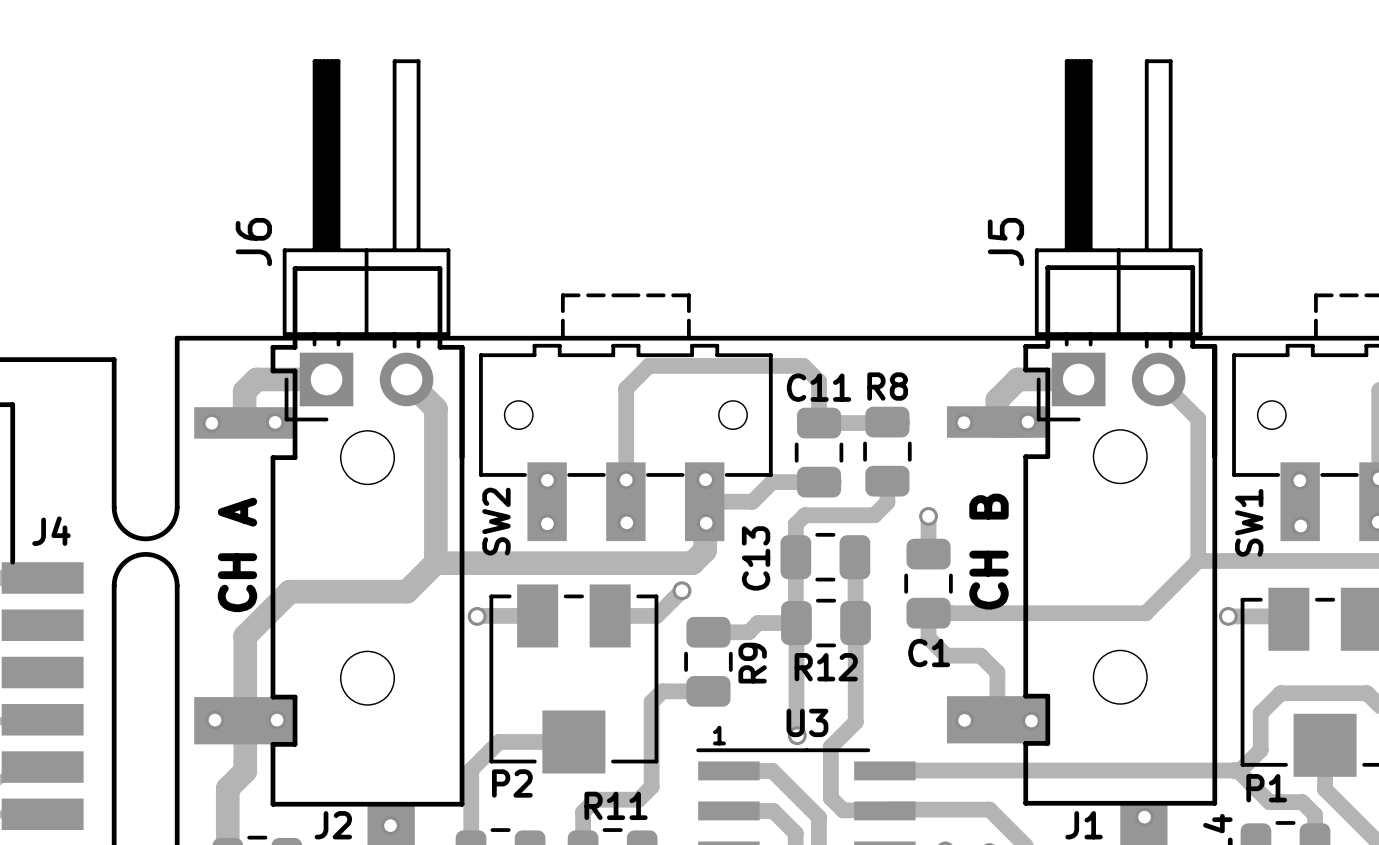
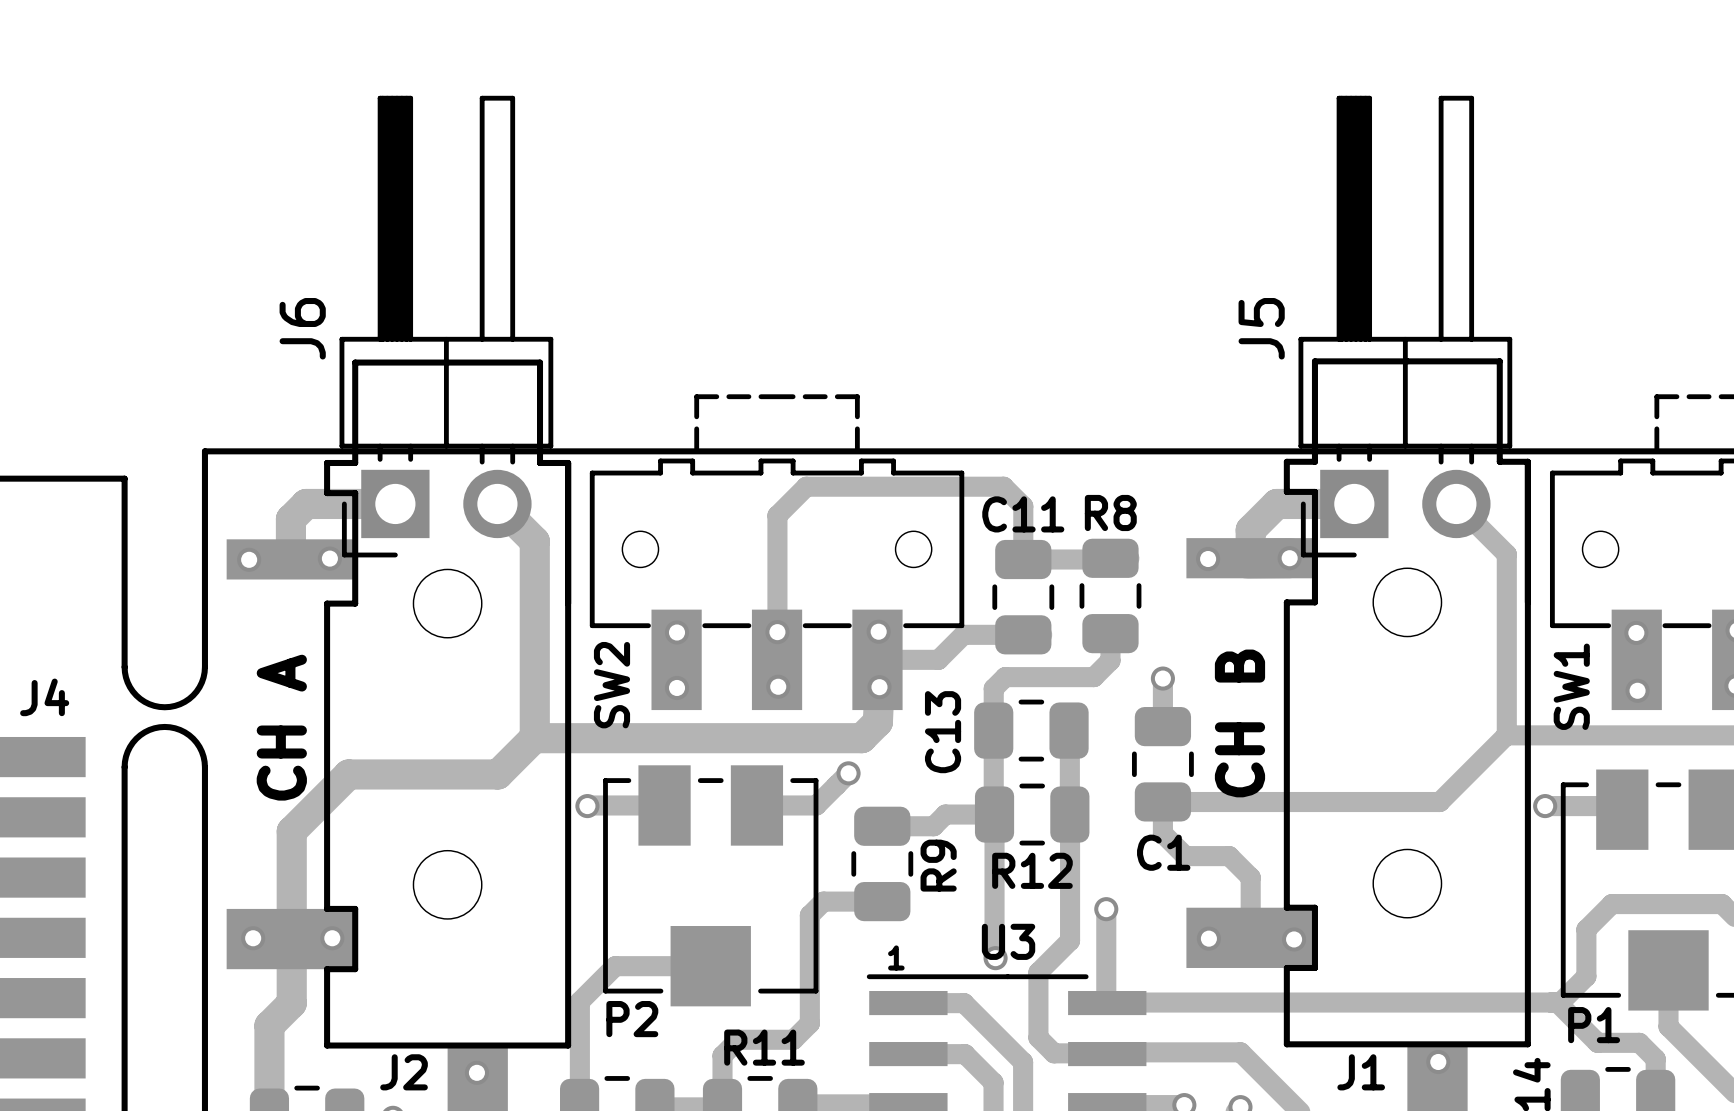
track: none -> (1106, 909) (1107, 1003)
via: none -> (1106, 909)

